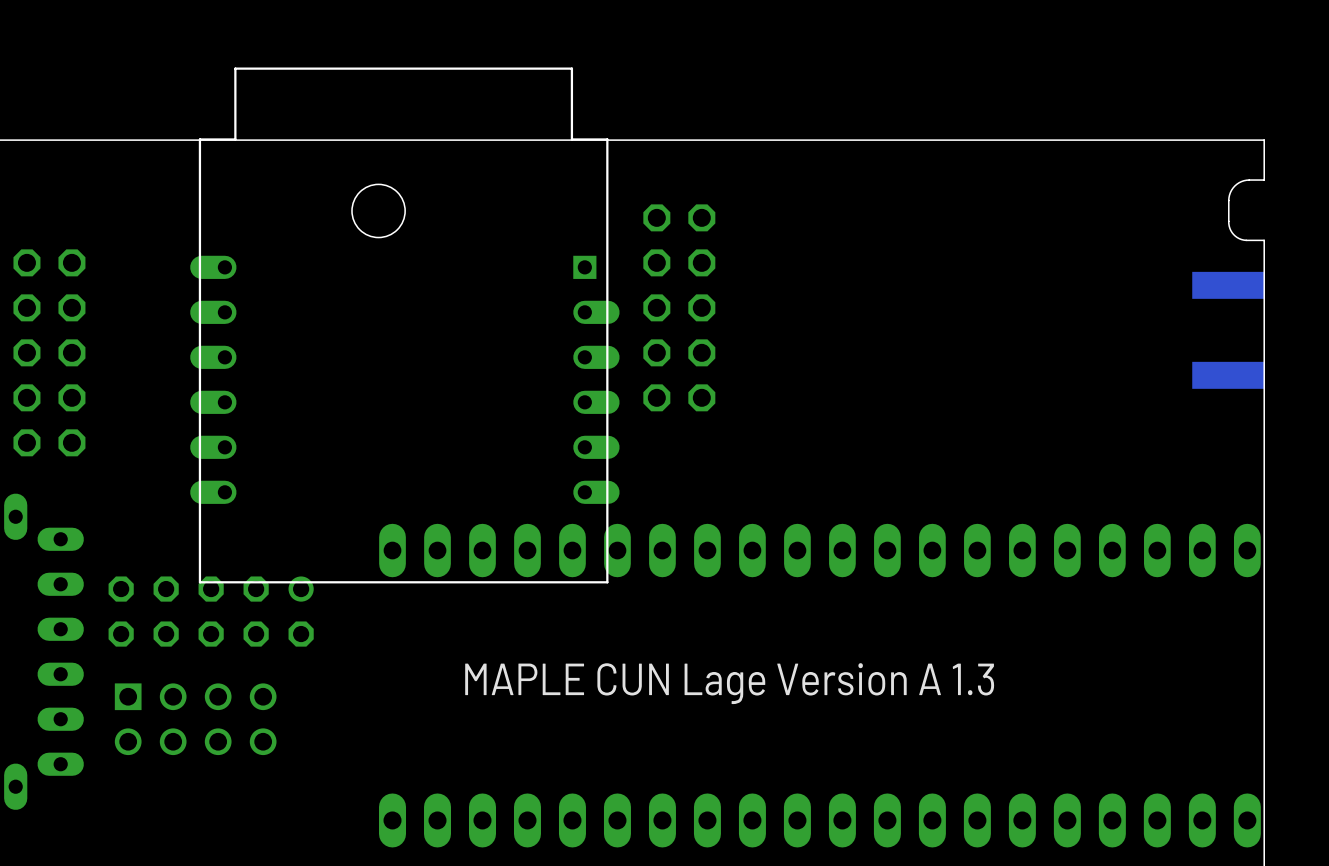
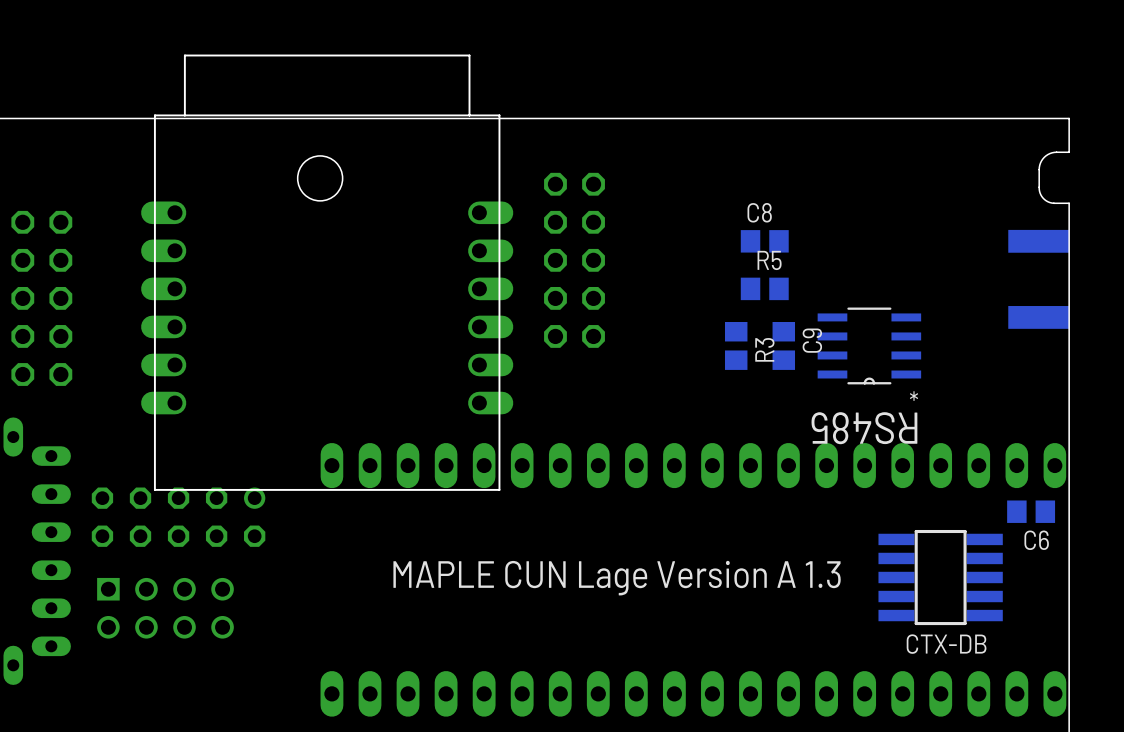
C8: none -> (764, 241)
part: none -> (327, 272)
part: (404, 325) -> none
R5: none -> (764, 288)
R3: none -> (736, 345)
C9: none -> (783, 345)
RS485: none -> (869, 345)
C6: none -> (1031, 511)
CTX-DB: none -> (940, 577)

